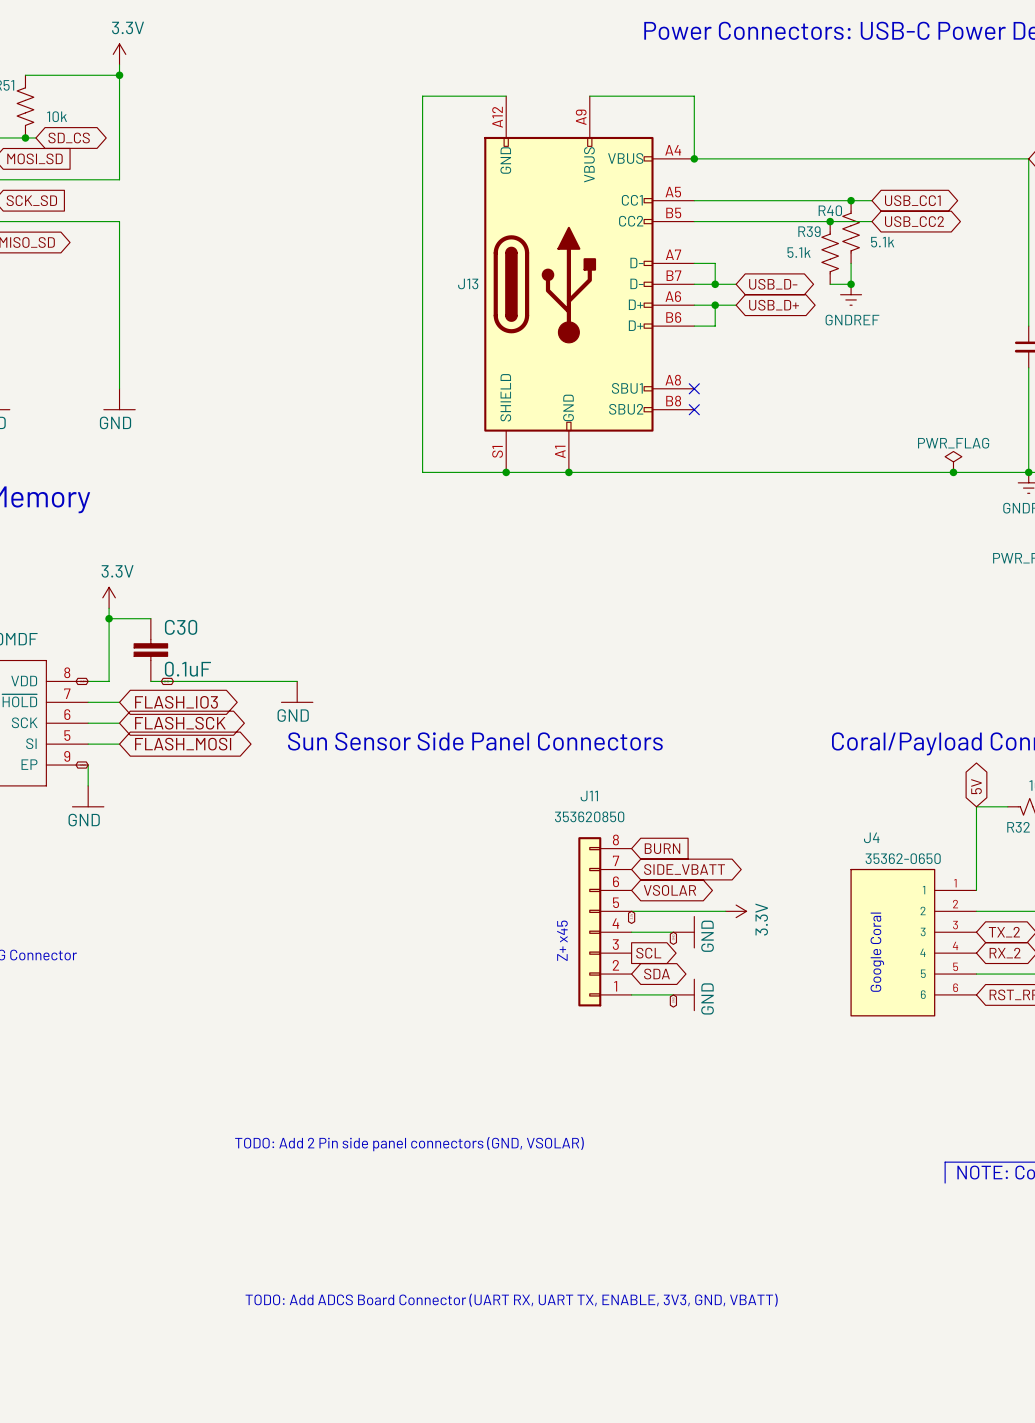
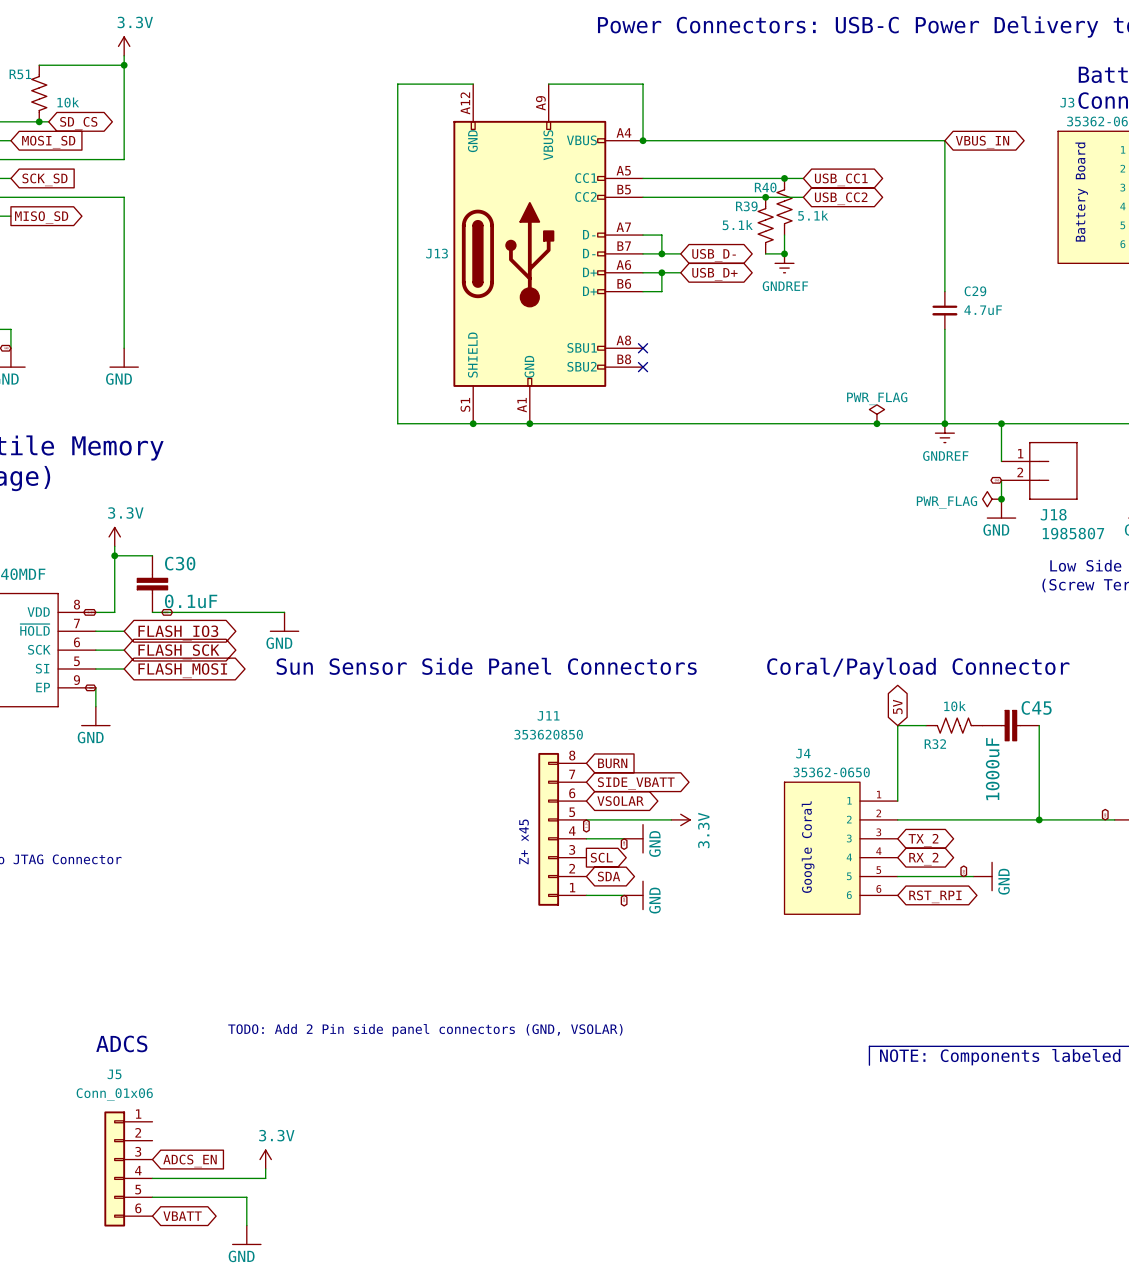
text: none -> ADCS (121, 1043)
global label: none -> ADCS_EN (190, 1160)
power symbol: none -> 3.3V (265, 1159)
J5: none -> Conn_01x06 (128, 1168)
wire: none -> (265, 1168) (265, 1178) (152, 1178)
text: TODO: Add ADCS Board Connector (UART RX, UART TX, ENABLE, 3V3, GND, VBATT) (511, 1300) -> none
wire: none -> (152, 1197) (246, 1197) (246, 1225)
global label: none -> VBATT (182, 1216)
power symbol: none -> GND (246, 1235)

